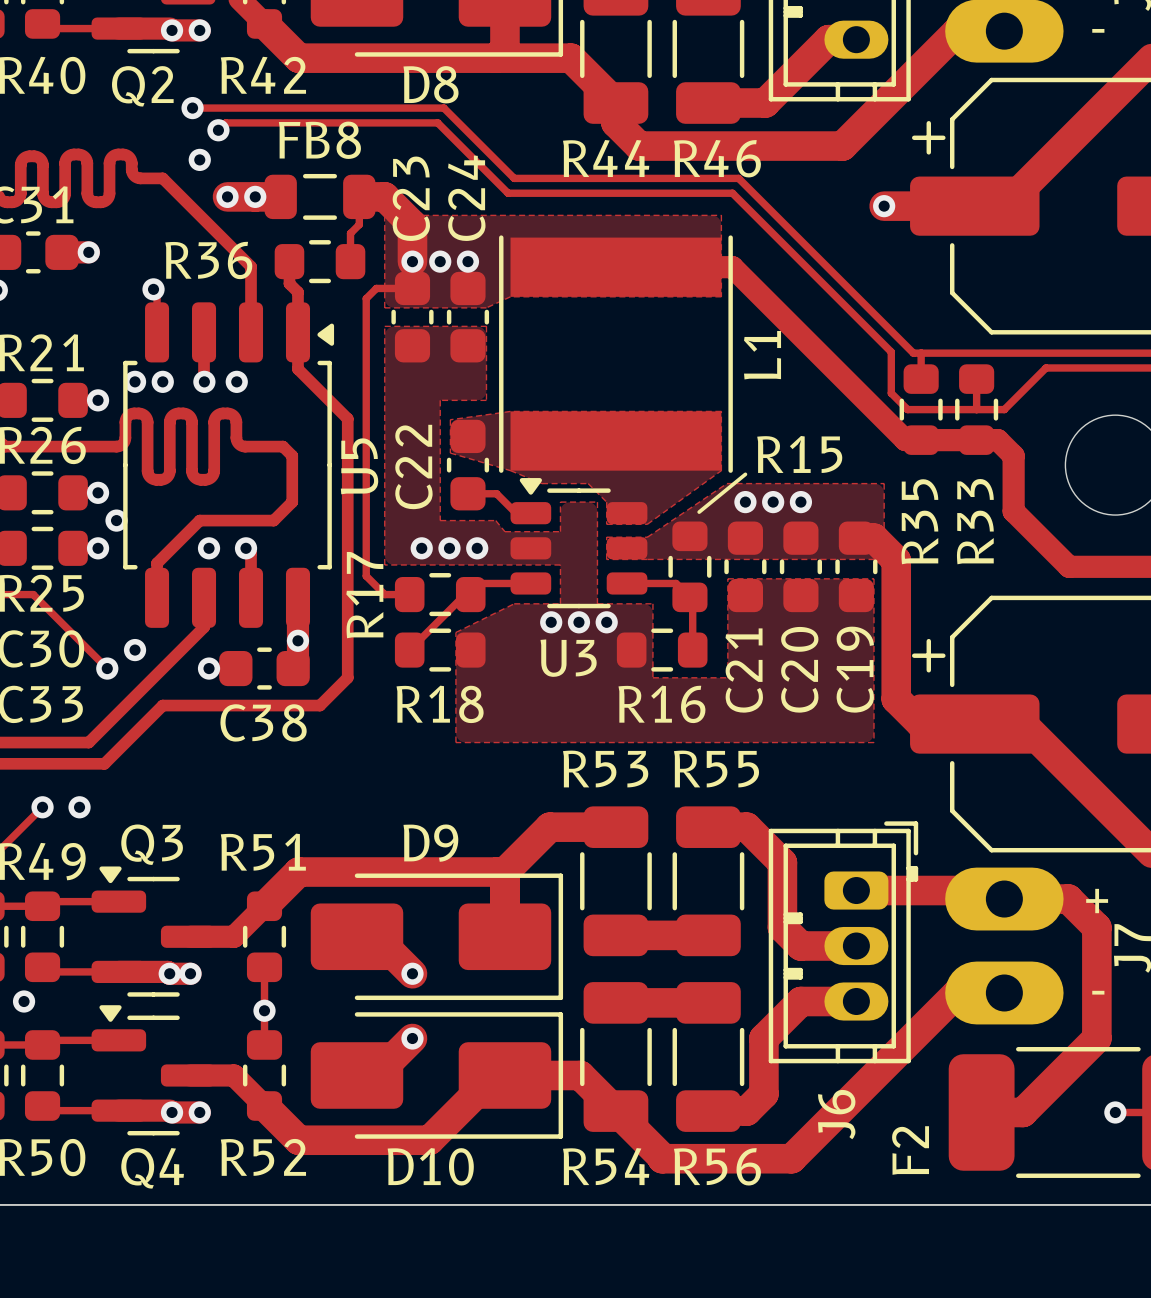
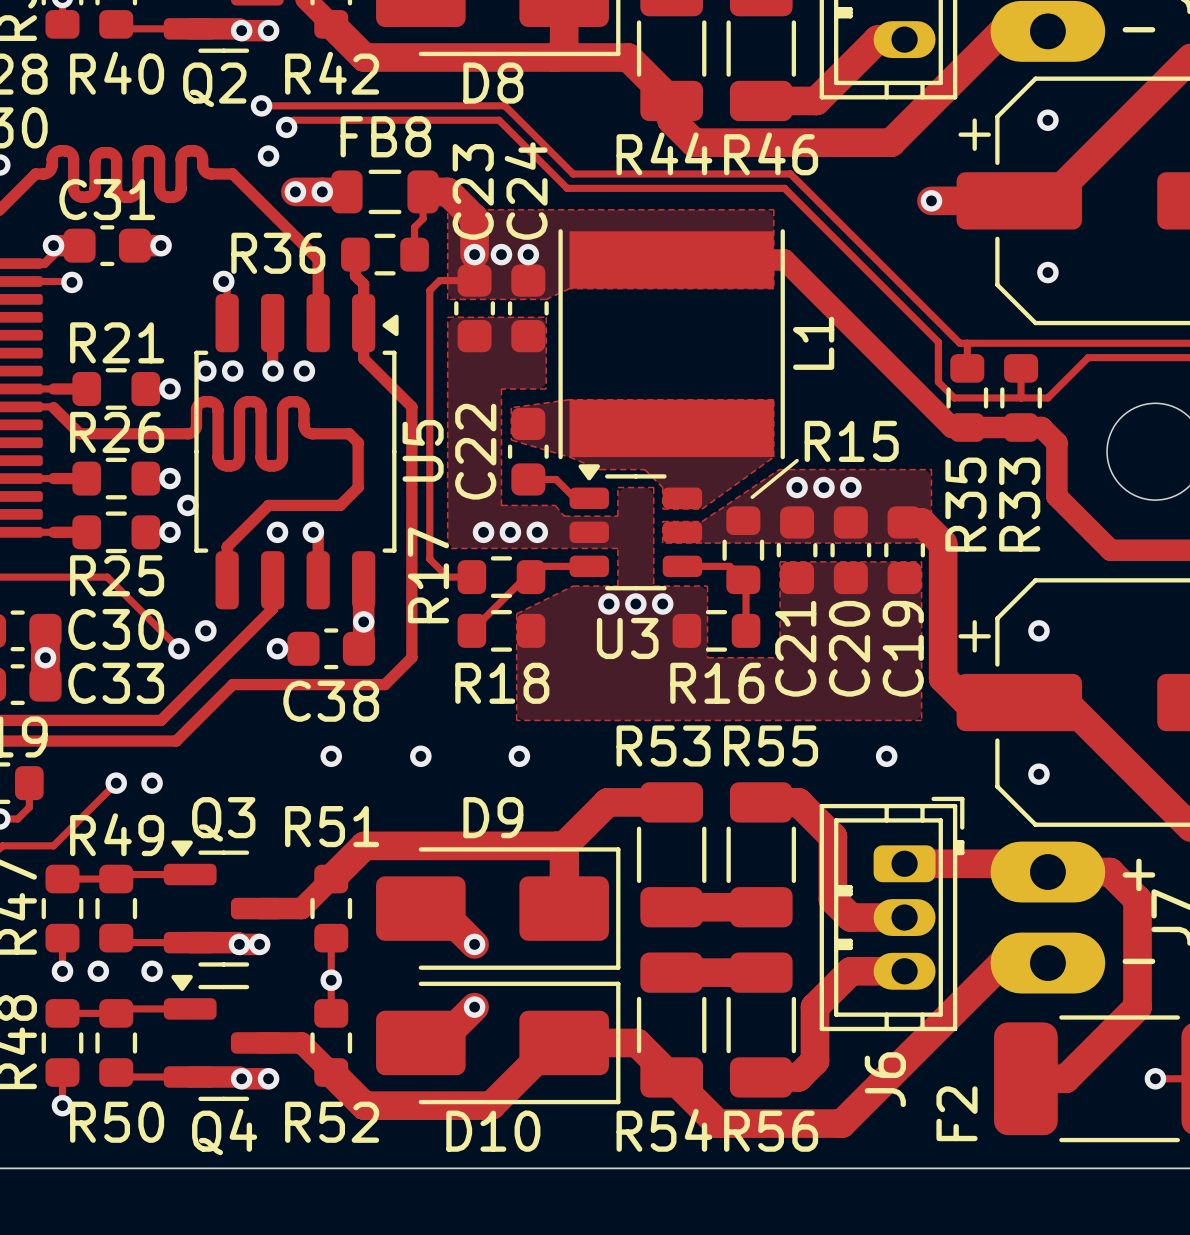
via: none -> (1047, 120)
via: none -> (1047, 272)
via: none -> (1038, 630)
via: none -> (331, 756)
via: none -> (420, 756)
via: none -> (519, 756)
via: none -> (886, 756)
via: none -> (1038, 774)
via: none -> (152, 971)

